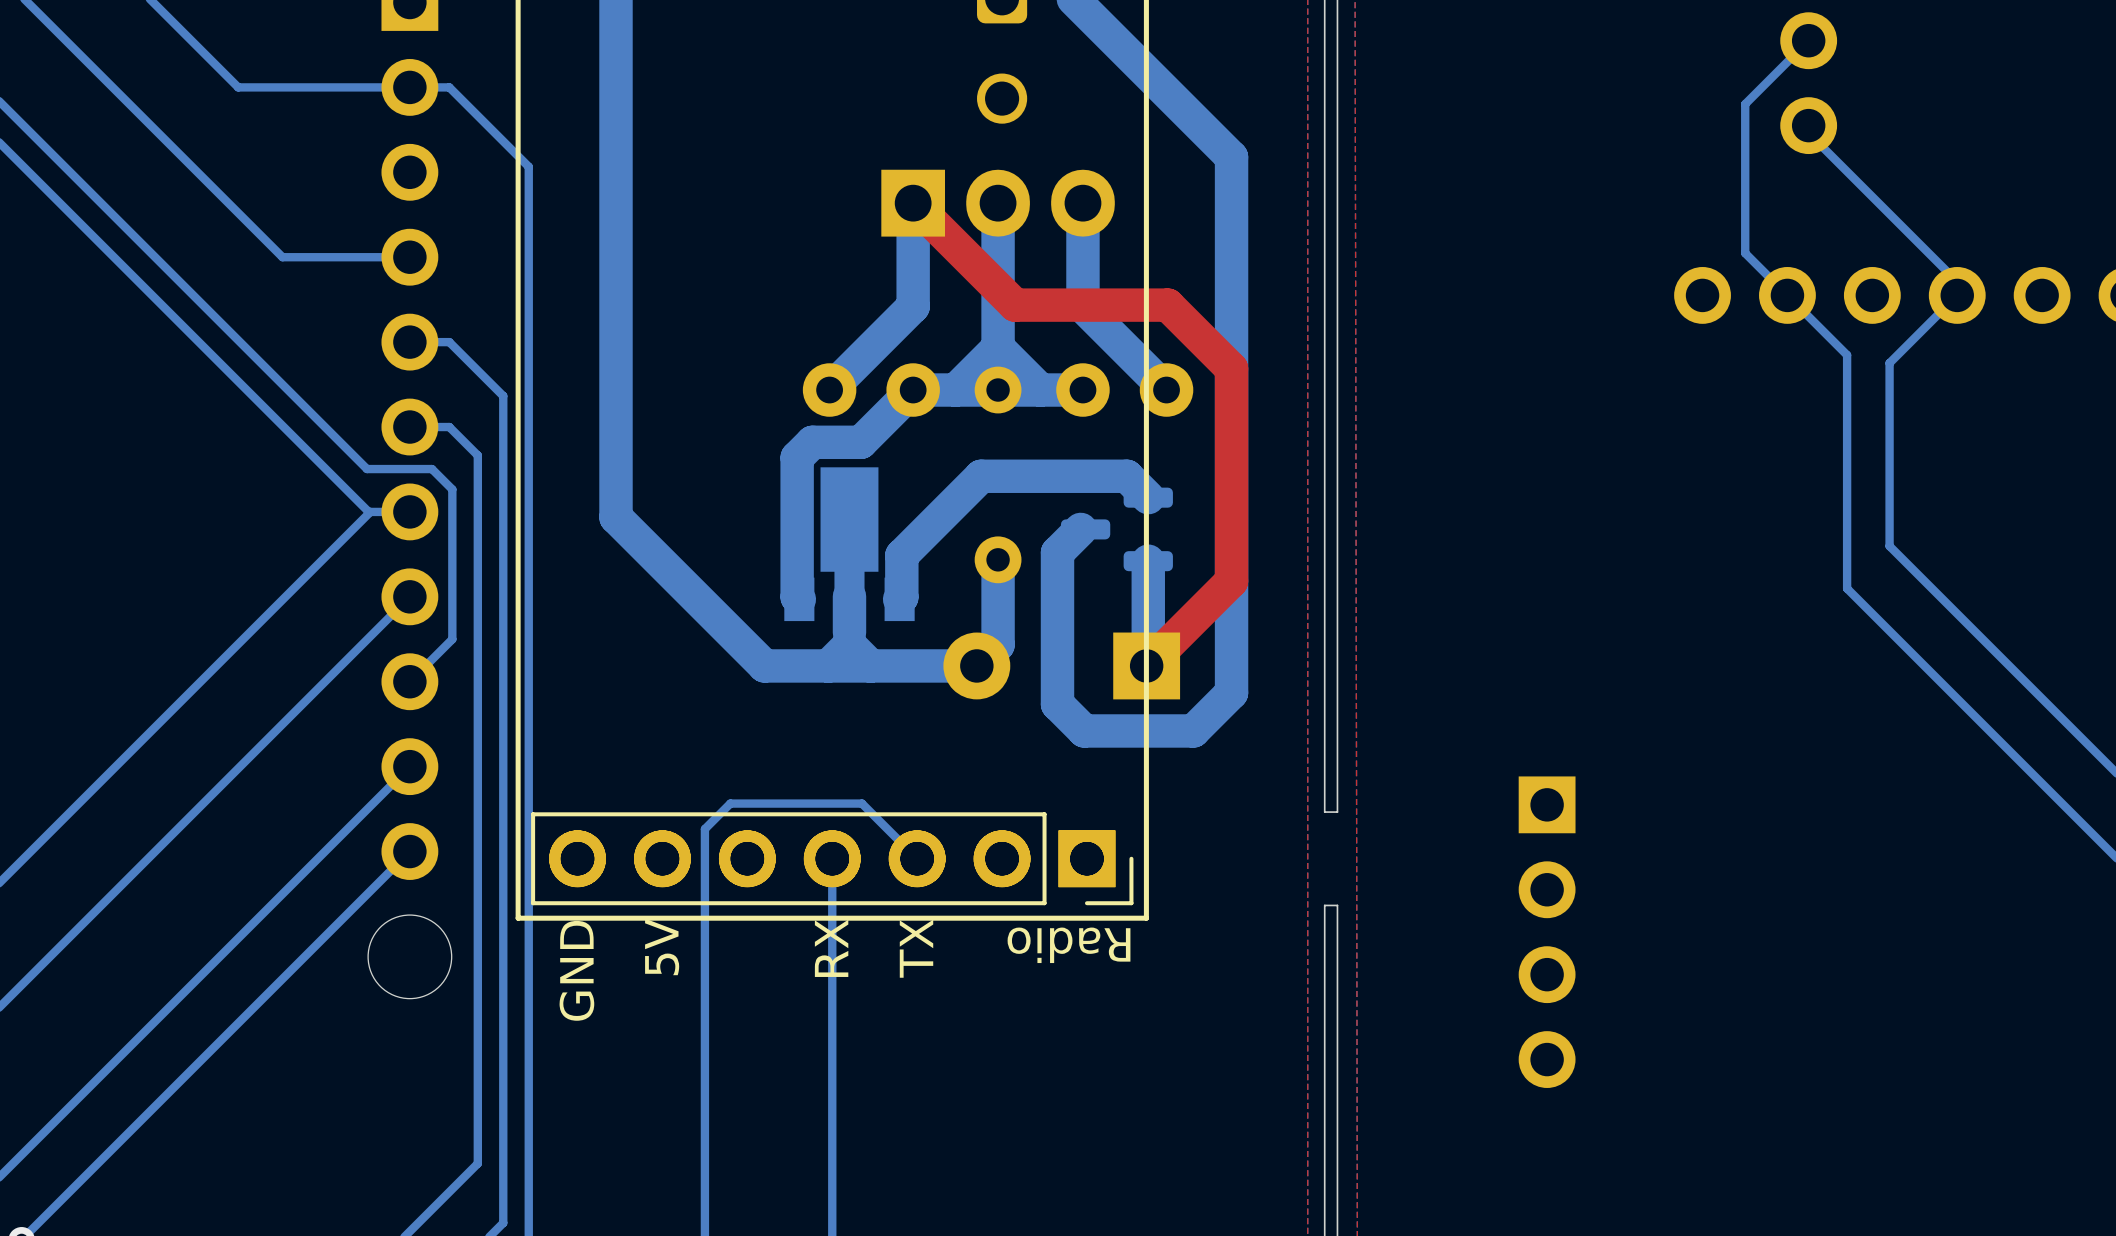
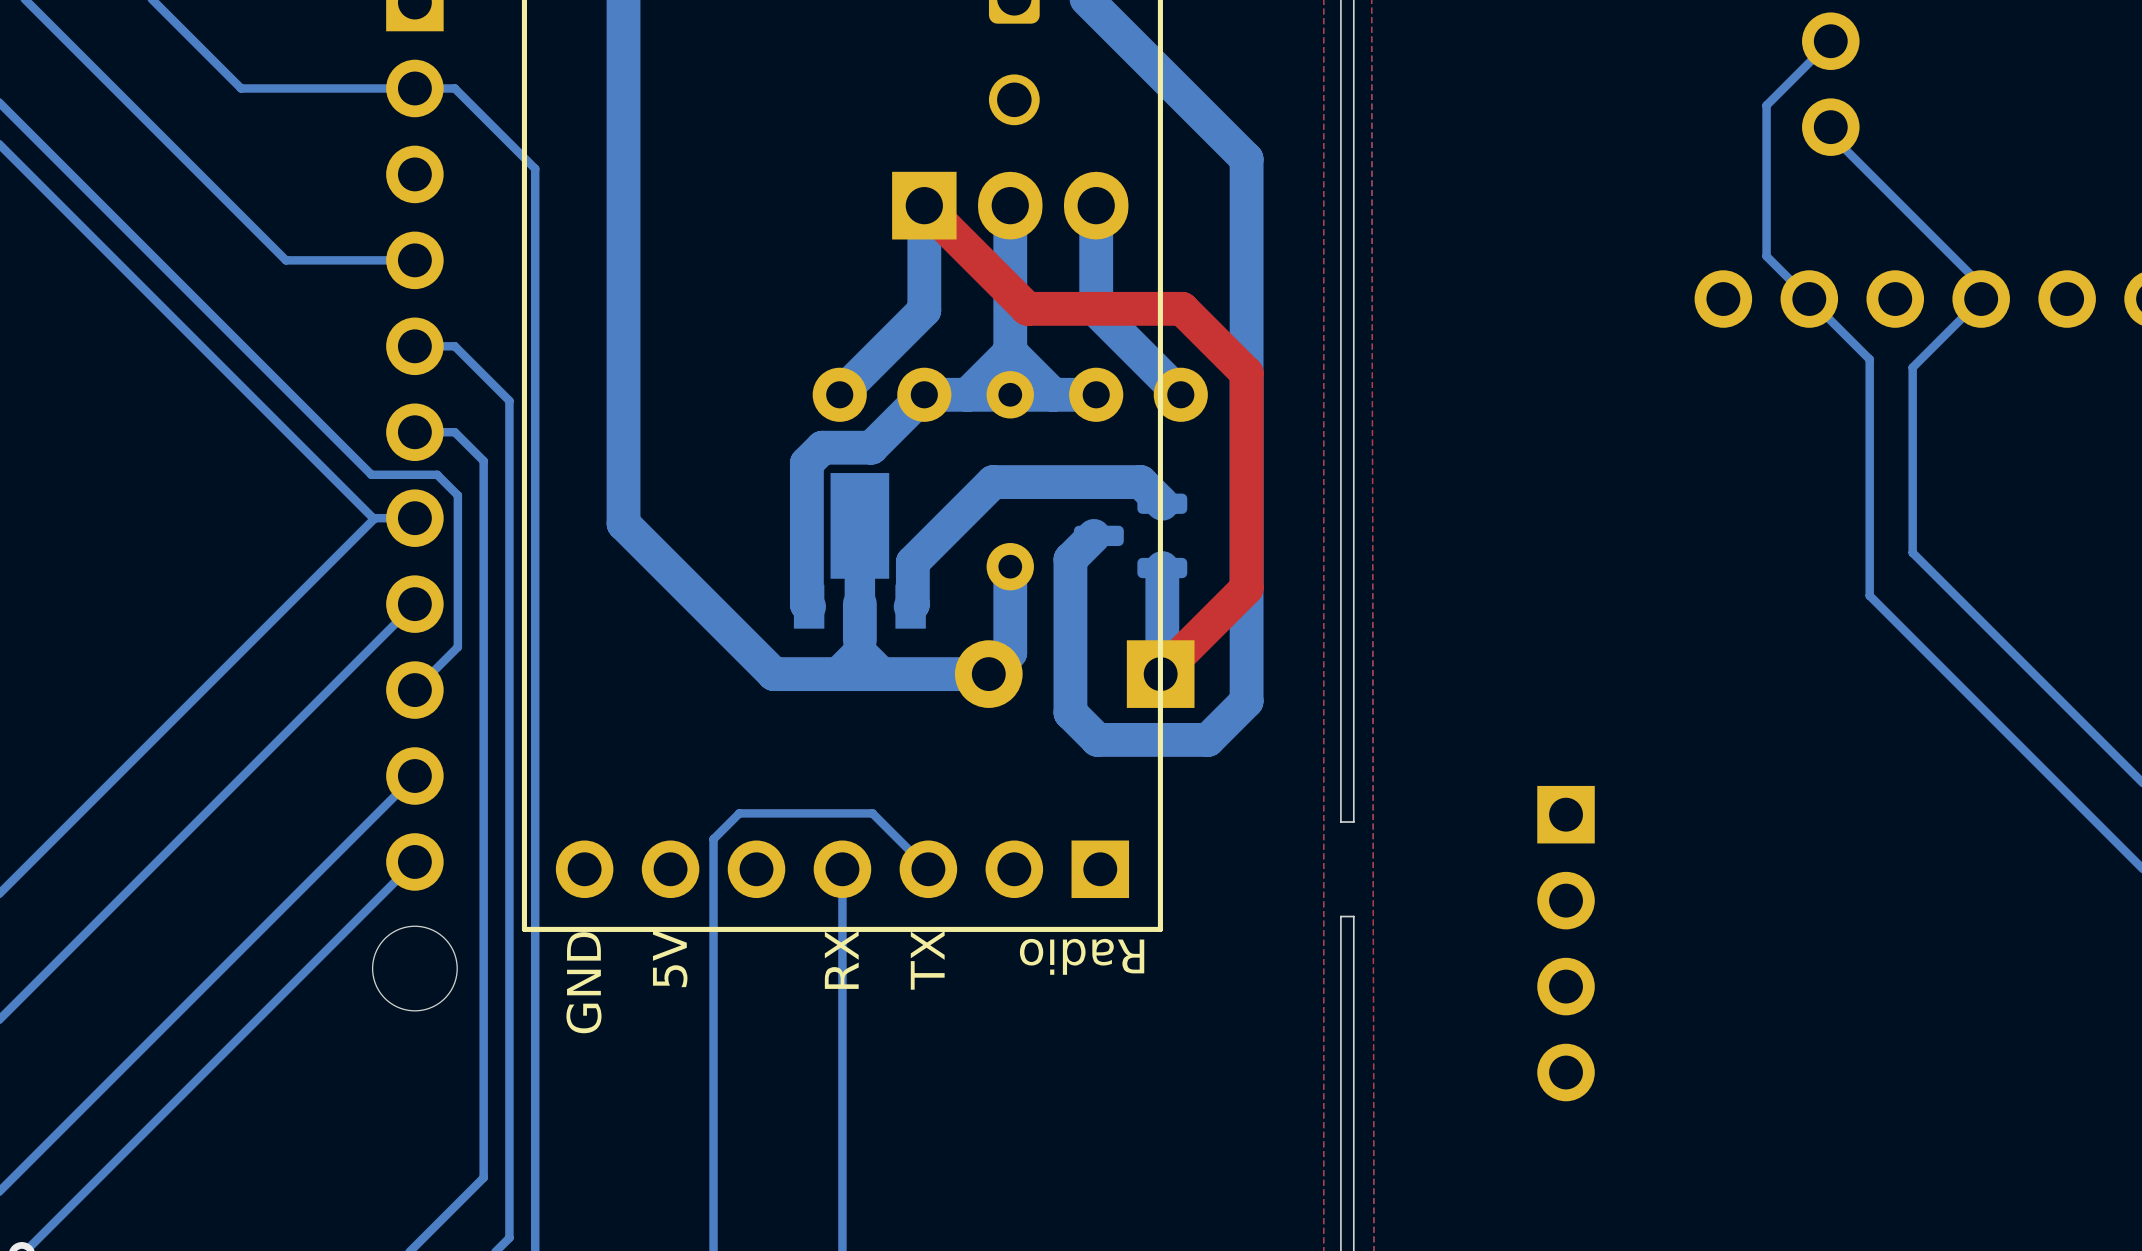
part: (832, 858) -> none

